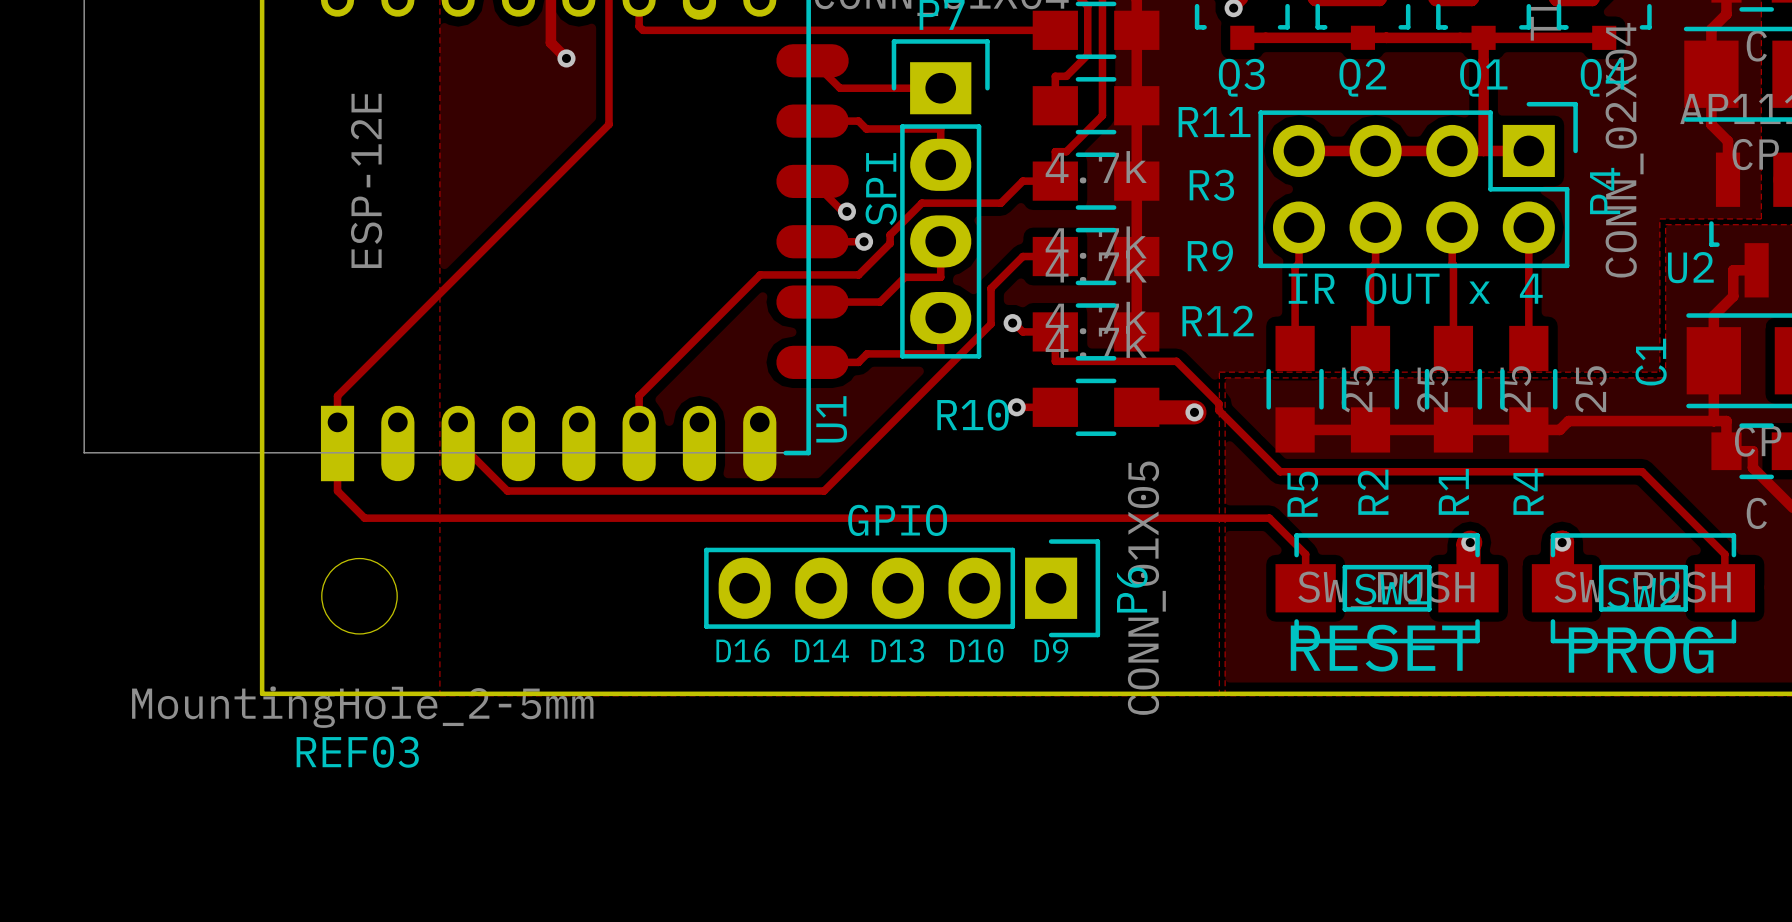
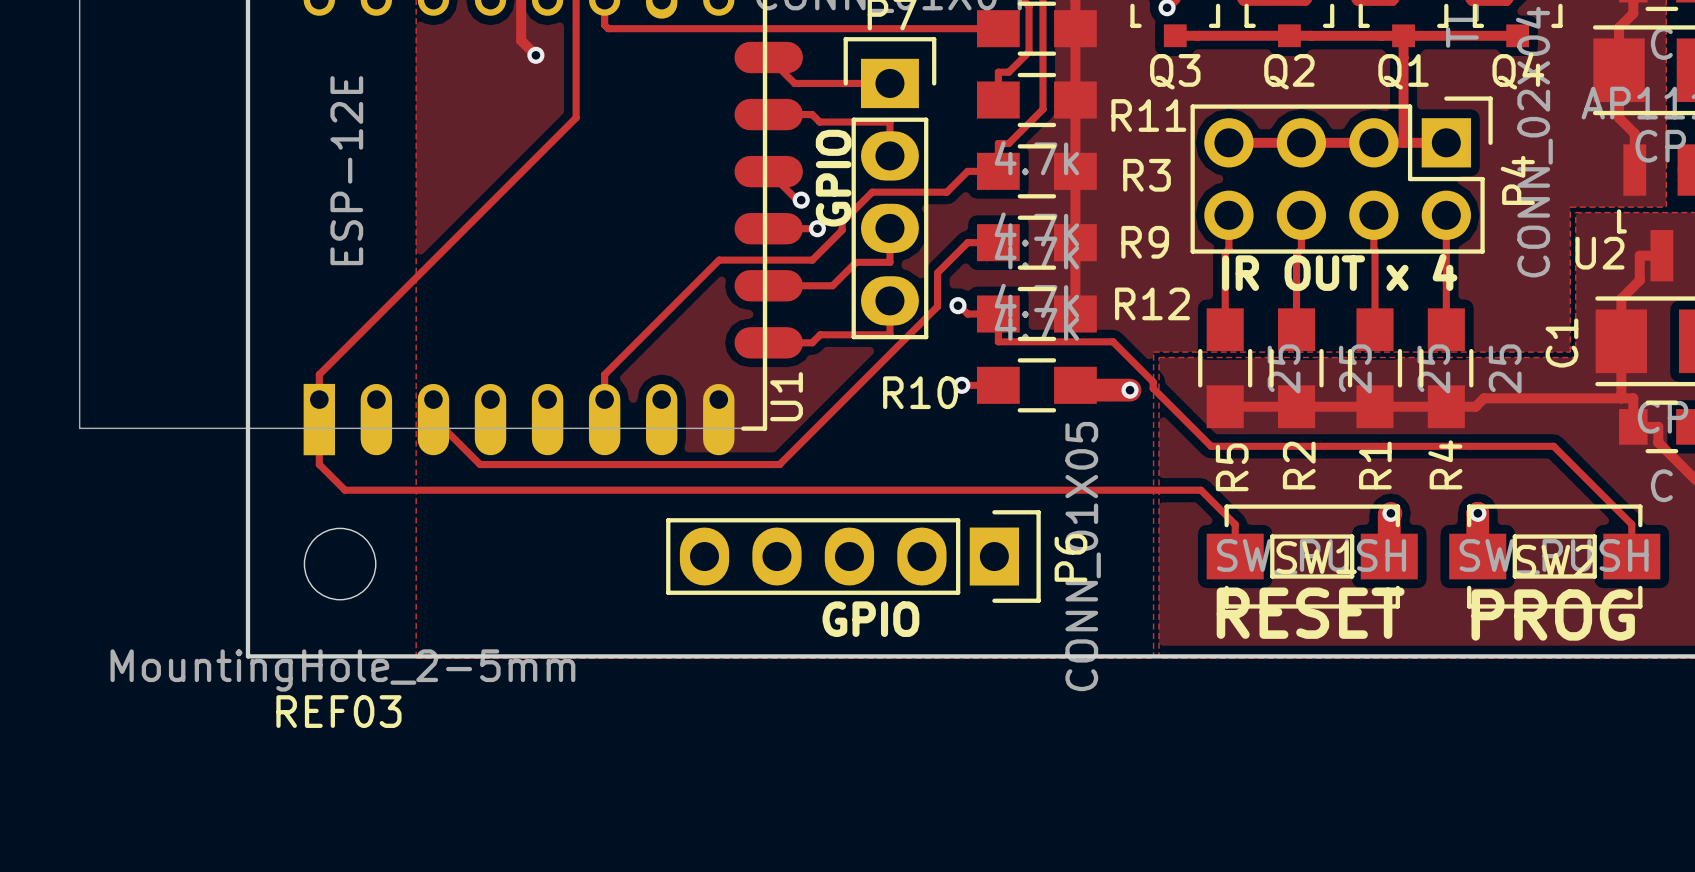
text: SPI (881, 189) -> GPIO (833, 178)
text: GPIO (897, 520) -> none
text: D14 (821, 650) -> none
text: D13 (897, 650) -> GPIO (870, 619)
text: D10 (976, 650) -> none
text: D9 (1051, 650) -> none
text: D16 (743, 651) -> none

